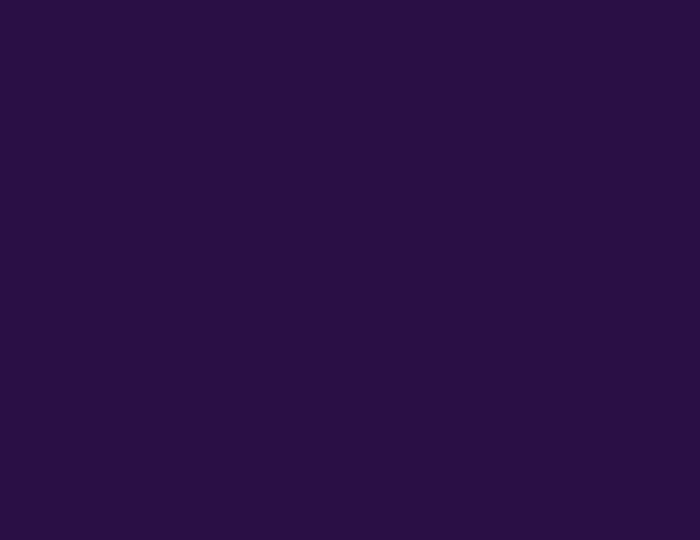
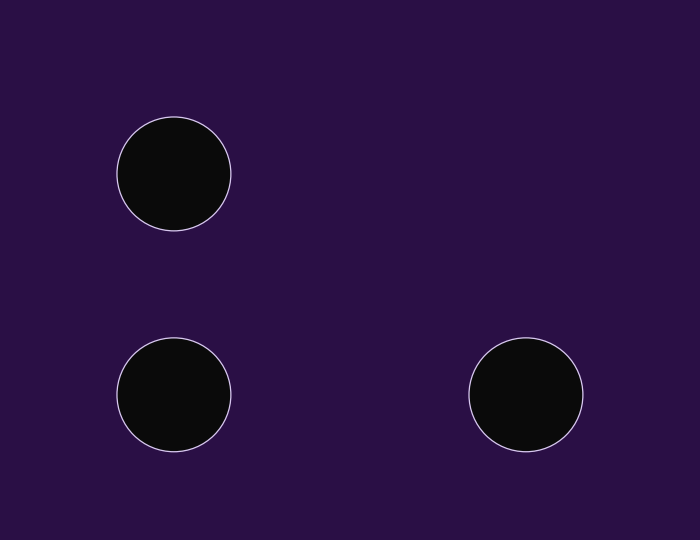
part: none -> (173, 173)
part: none -> (173, 394)
part: none -> (525, 394)

